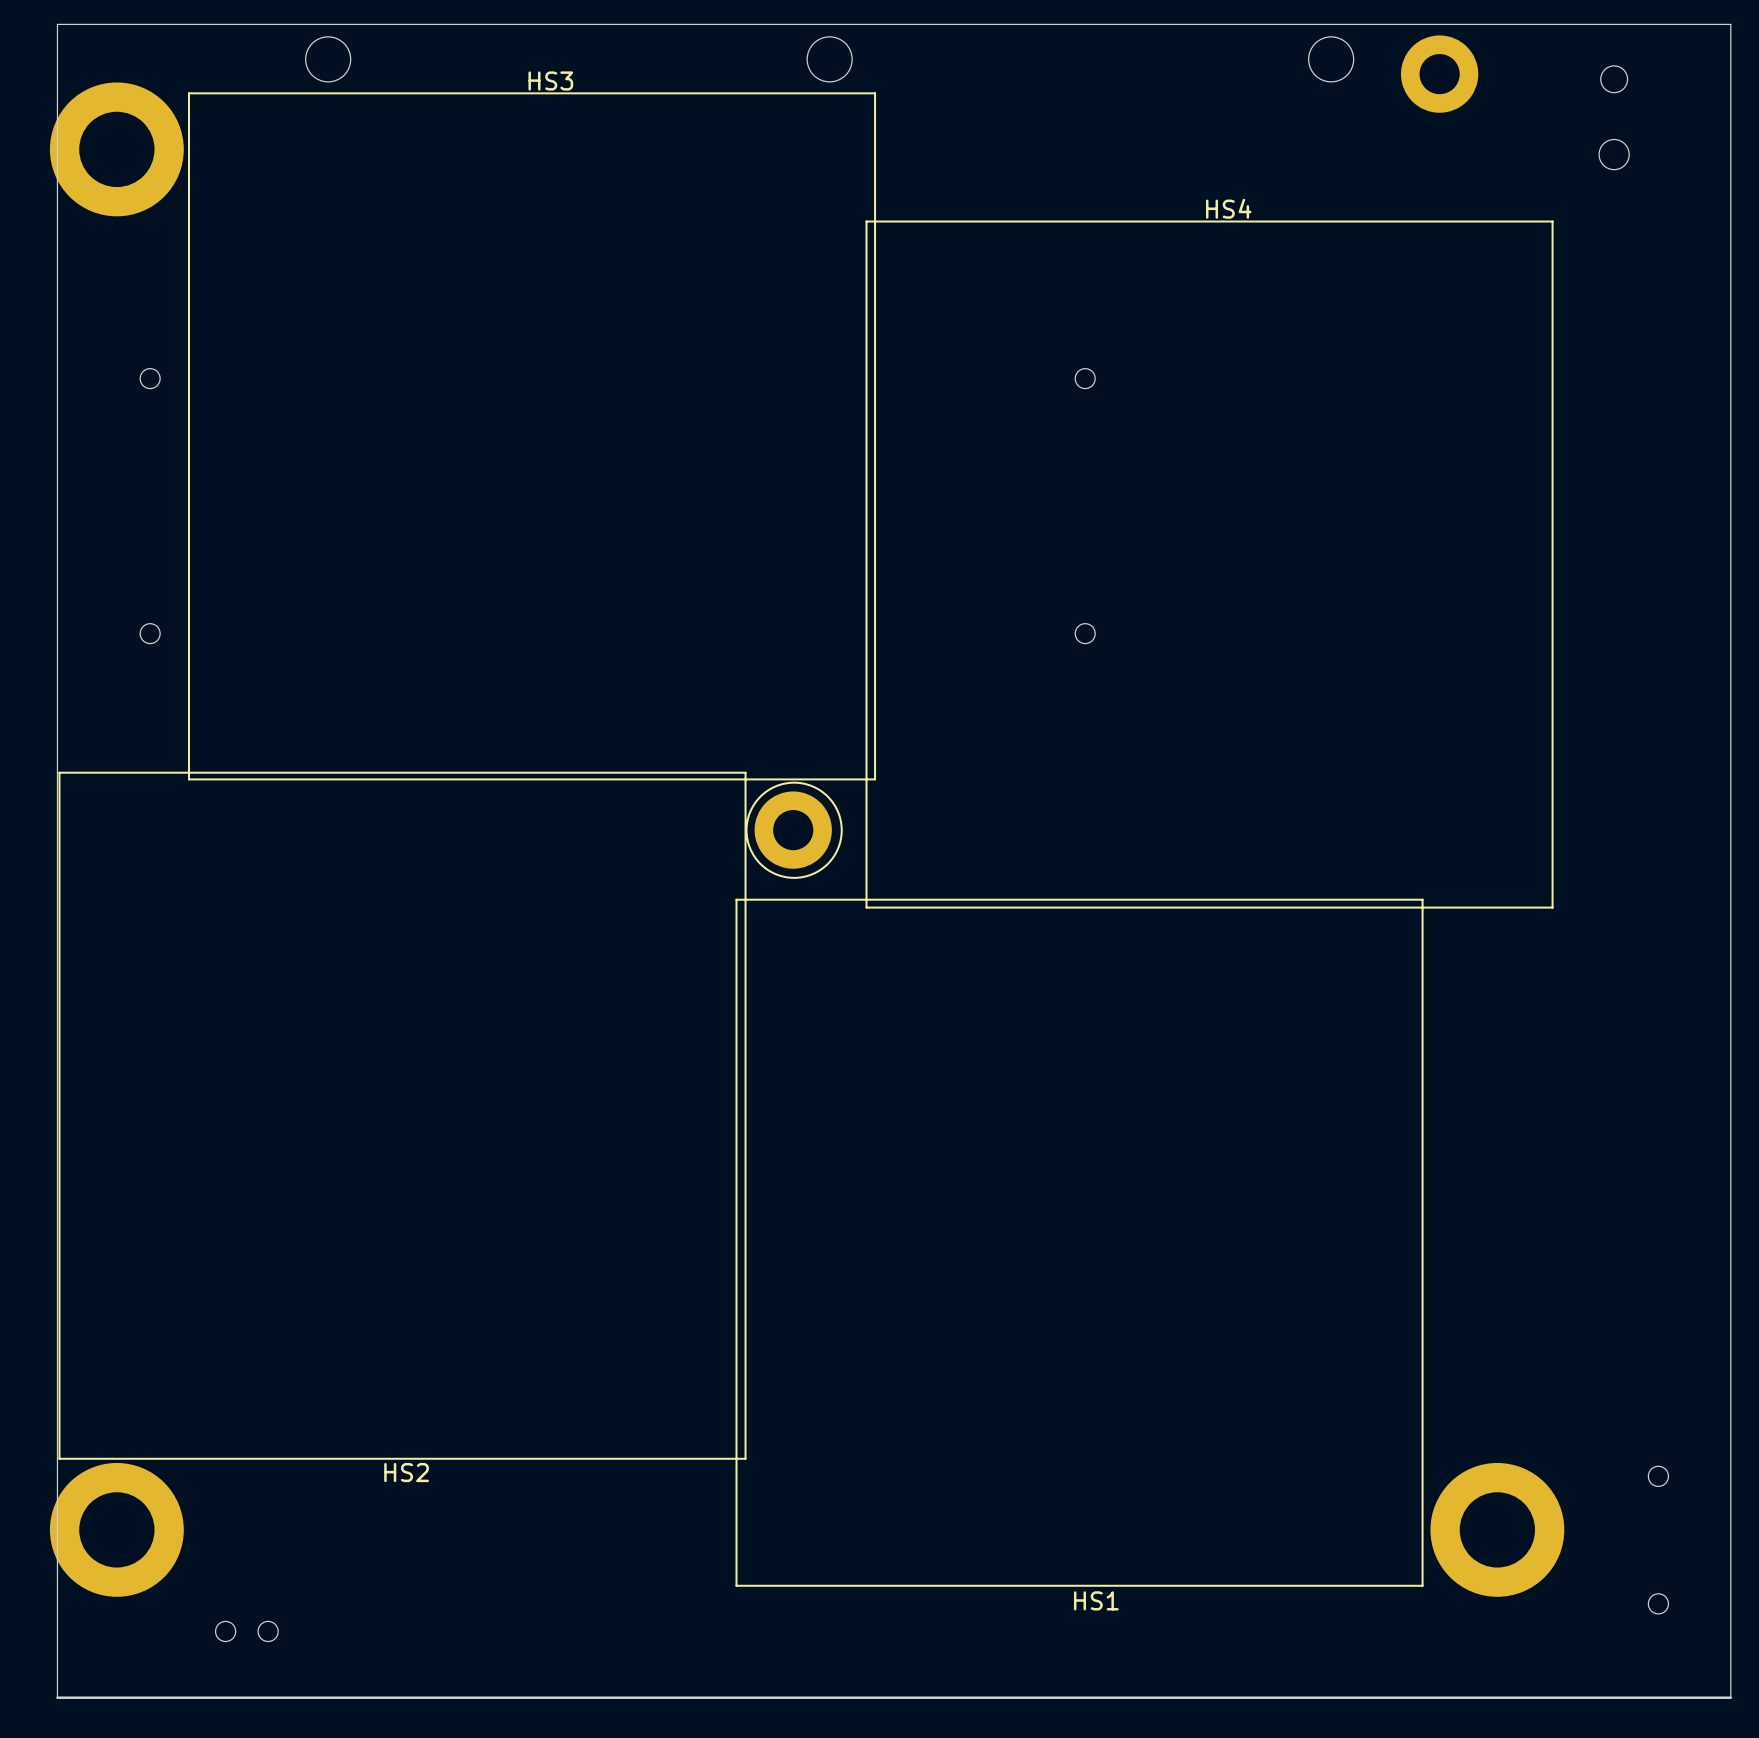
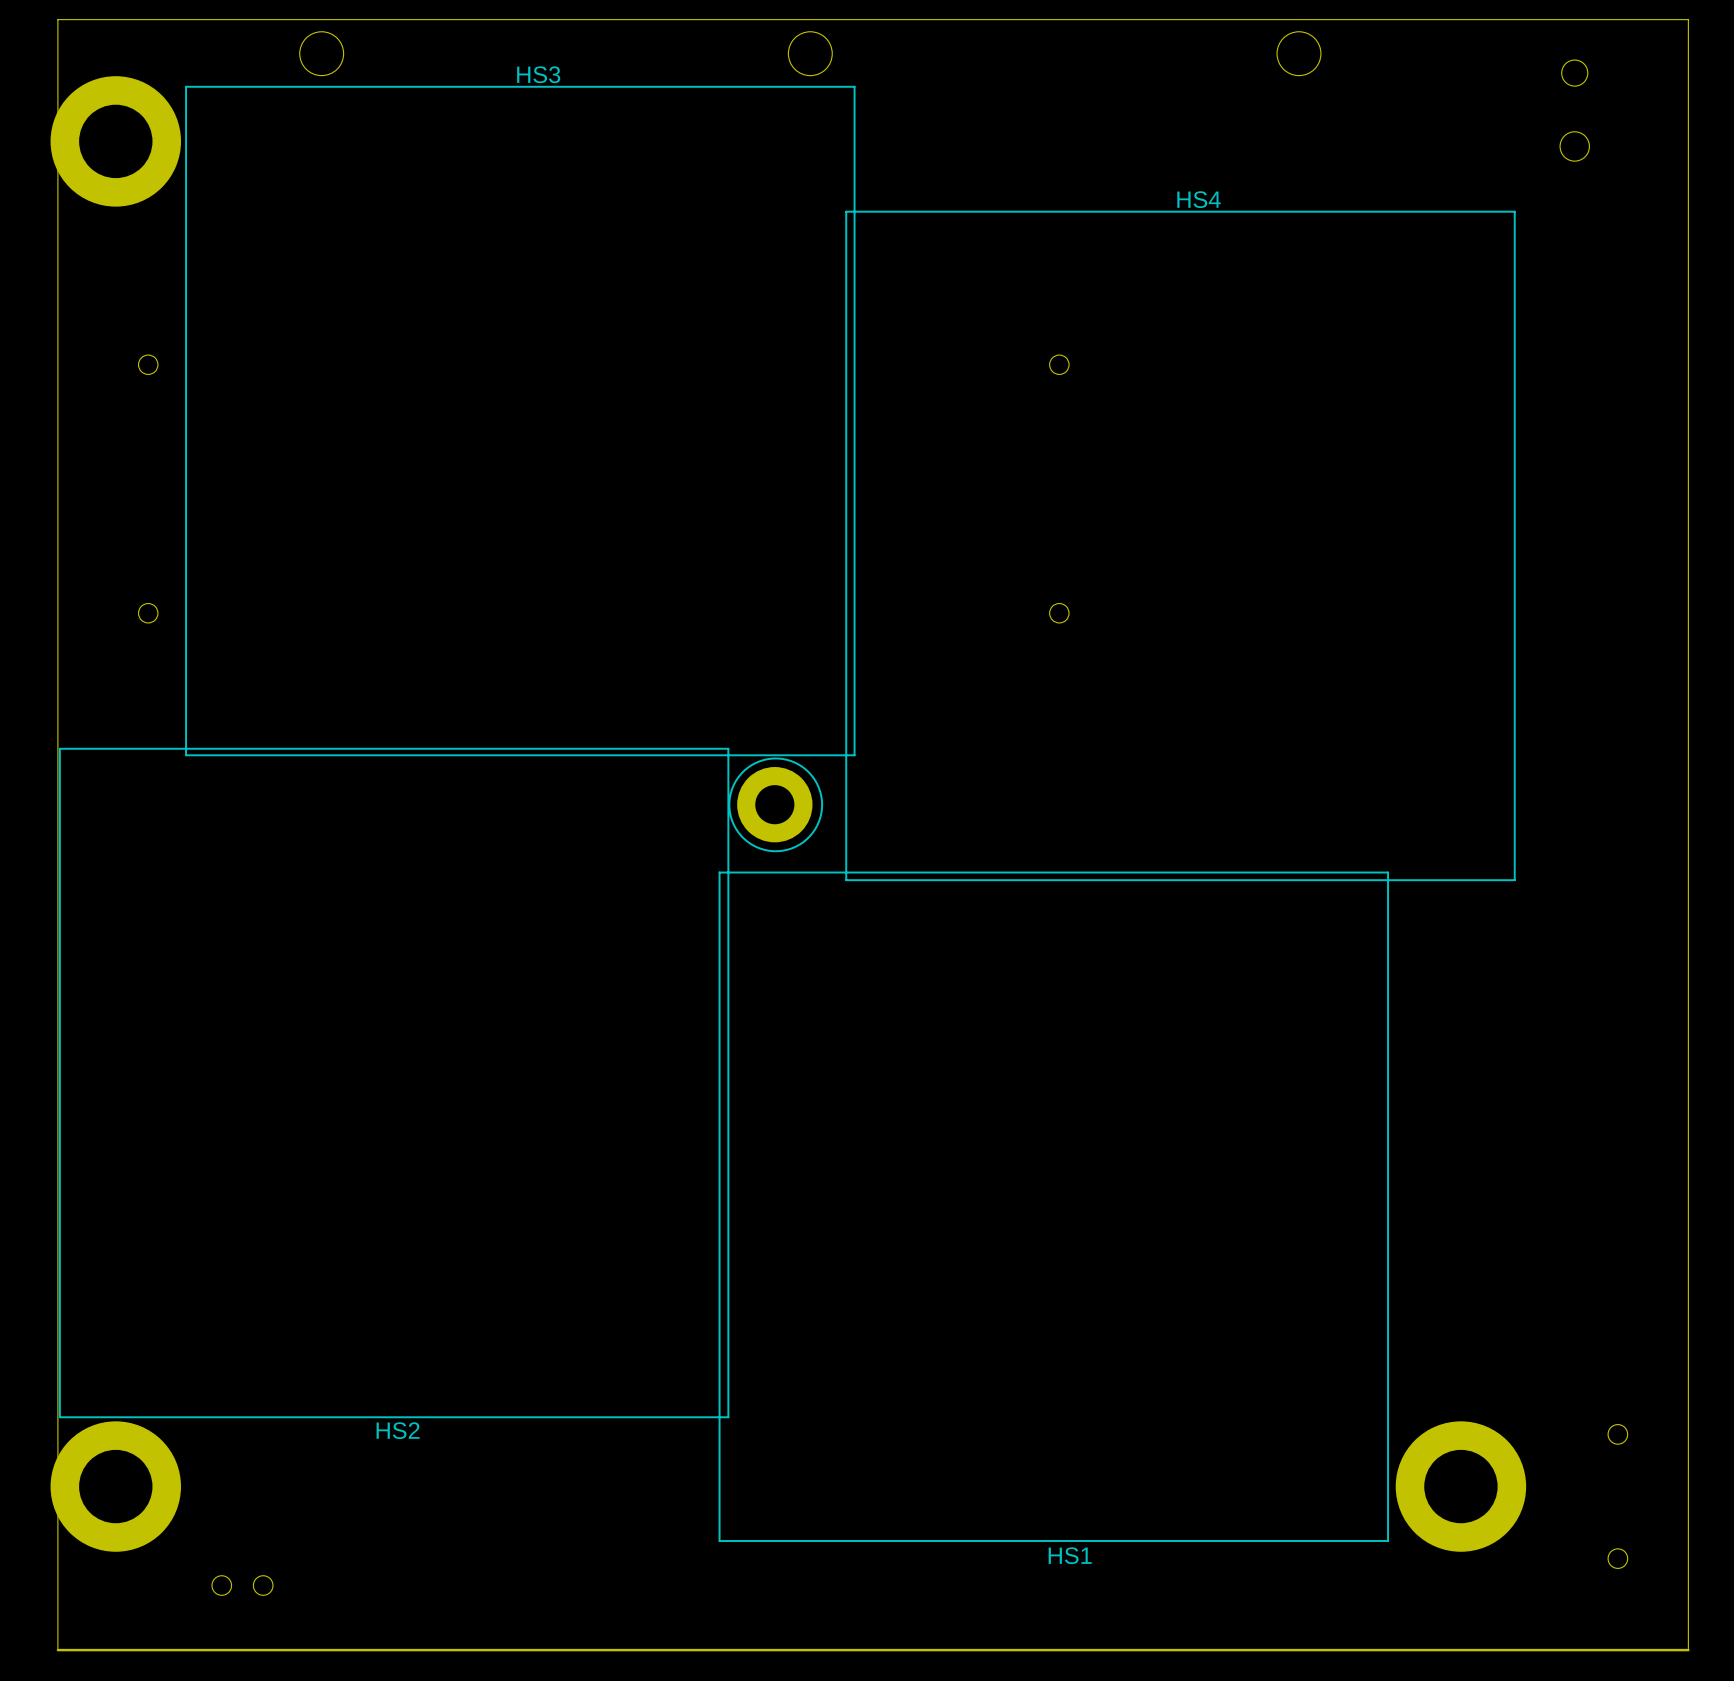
part: (1439, 74) -> none

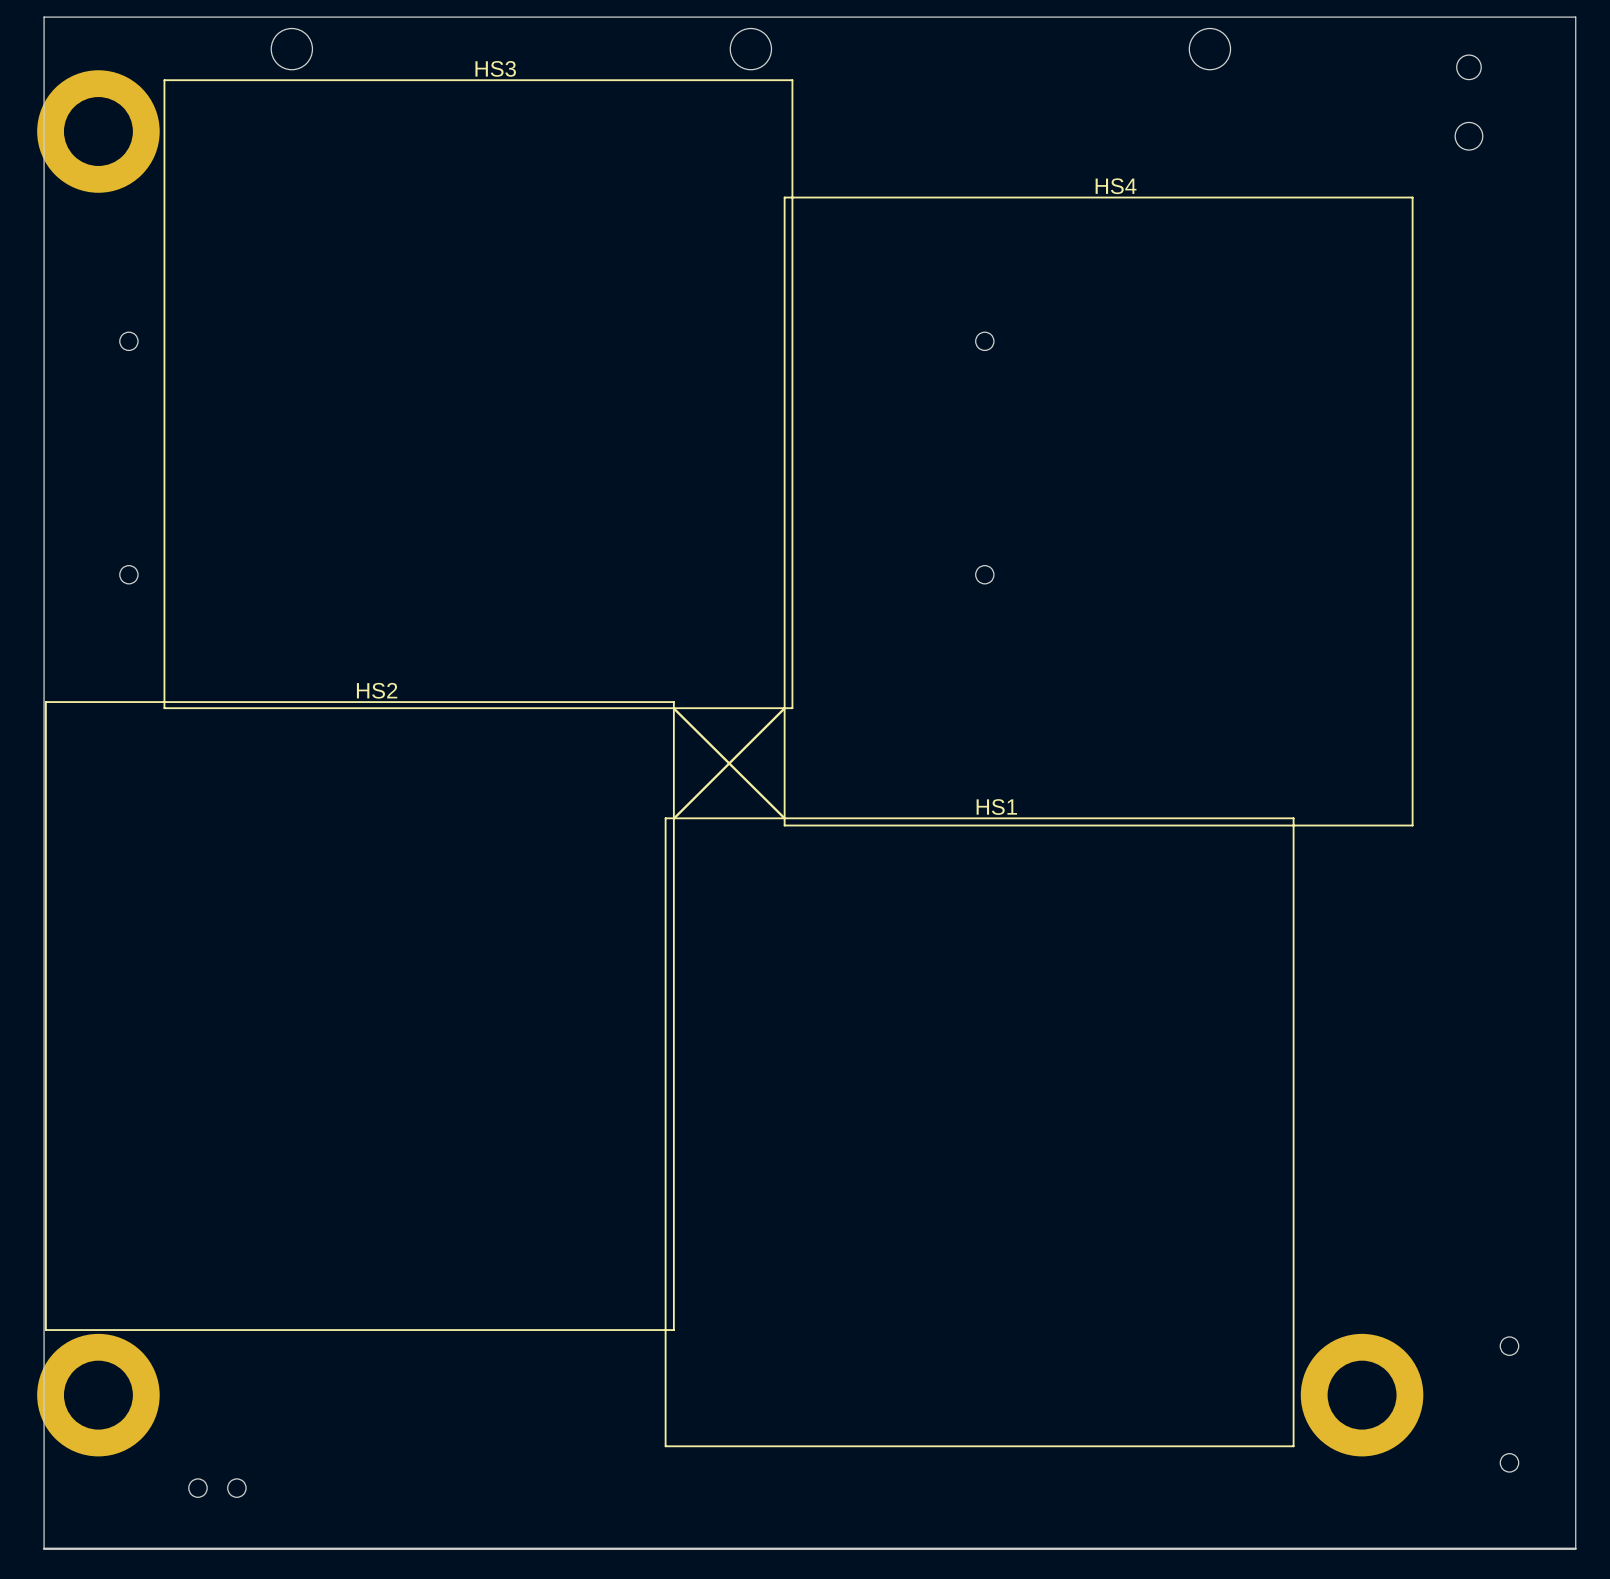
line: none -> (674, 708) (784, 817)
line: none -> (784, 708) (674, 818)
drawing: [728, 757, 824, 853] -> none
part: (774, 804) -> none
HS2 name position: HS2 (398, 1430) -> HS2 (377, 690)
HS1 name position: HS1 (1070, 1555) -> HS1 (996, 807)

